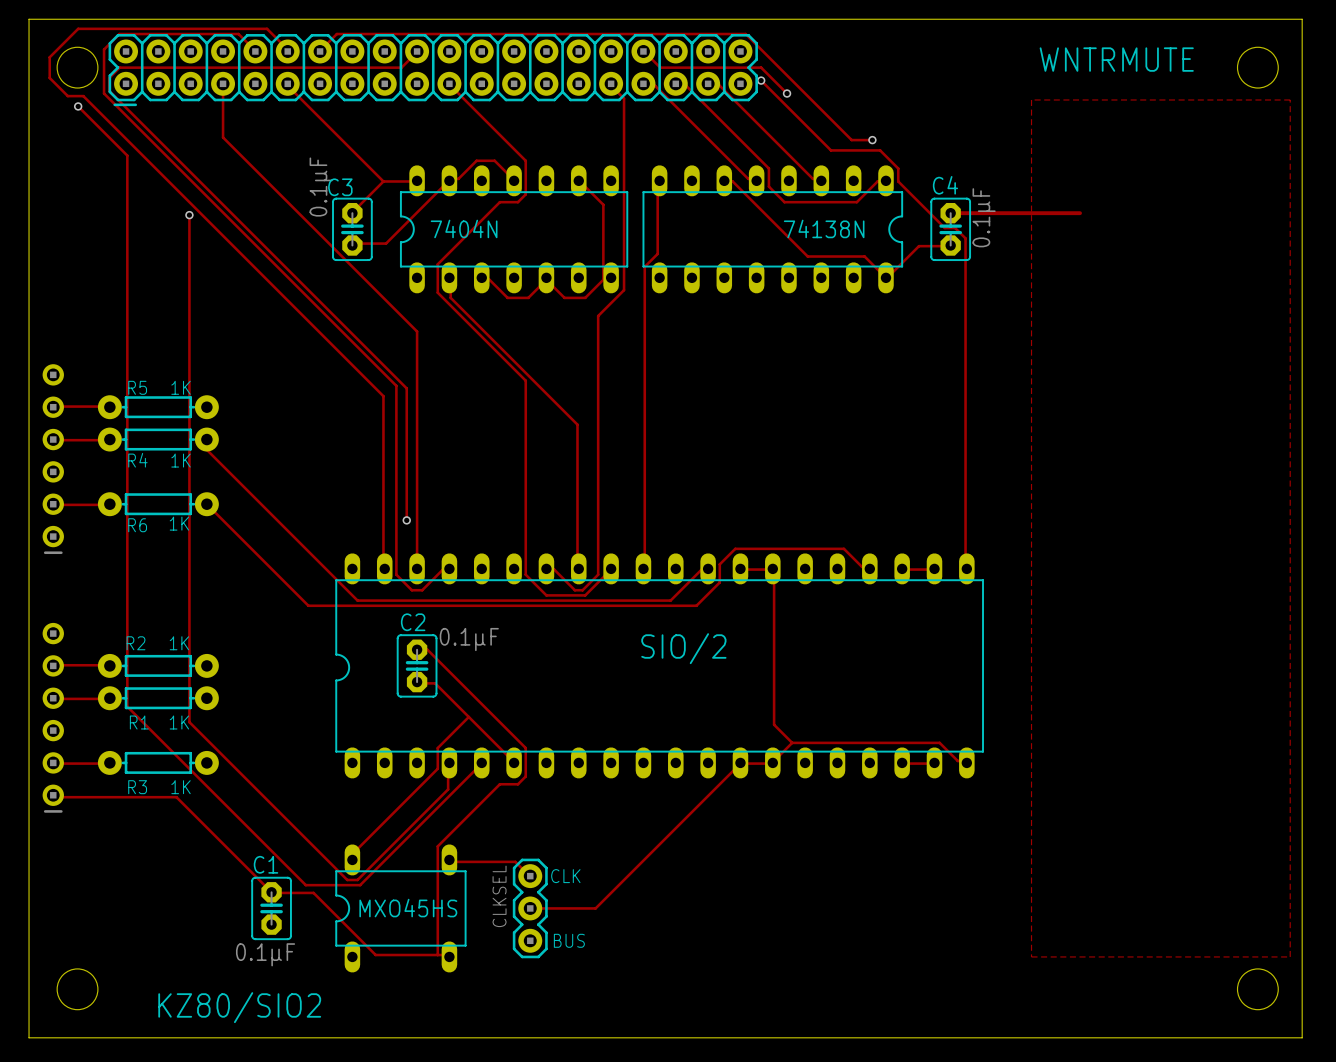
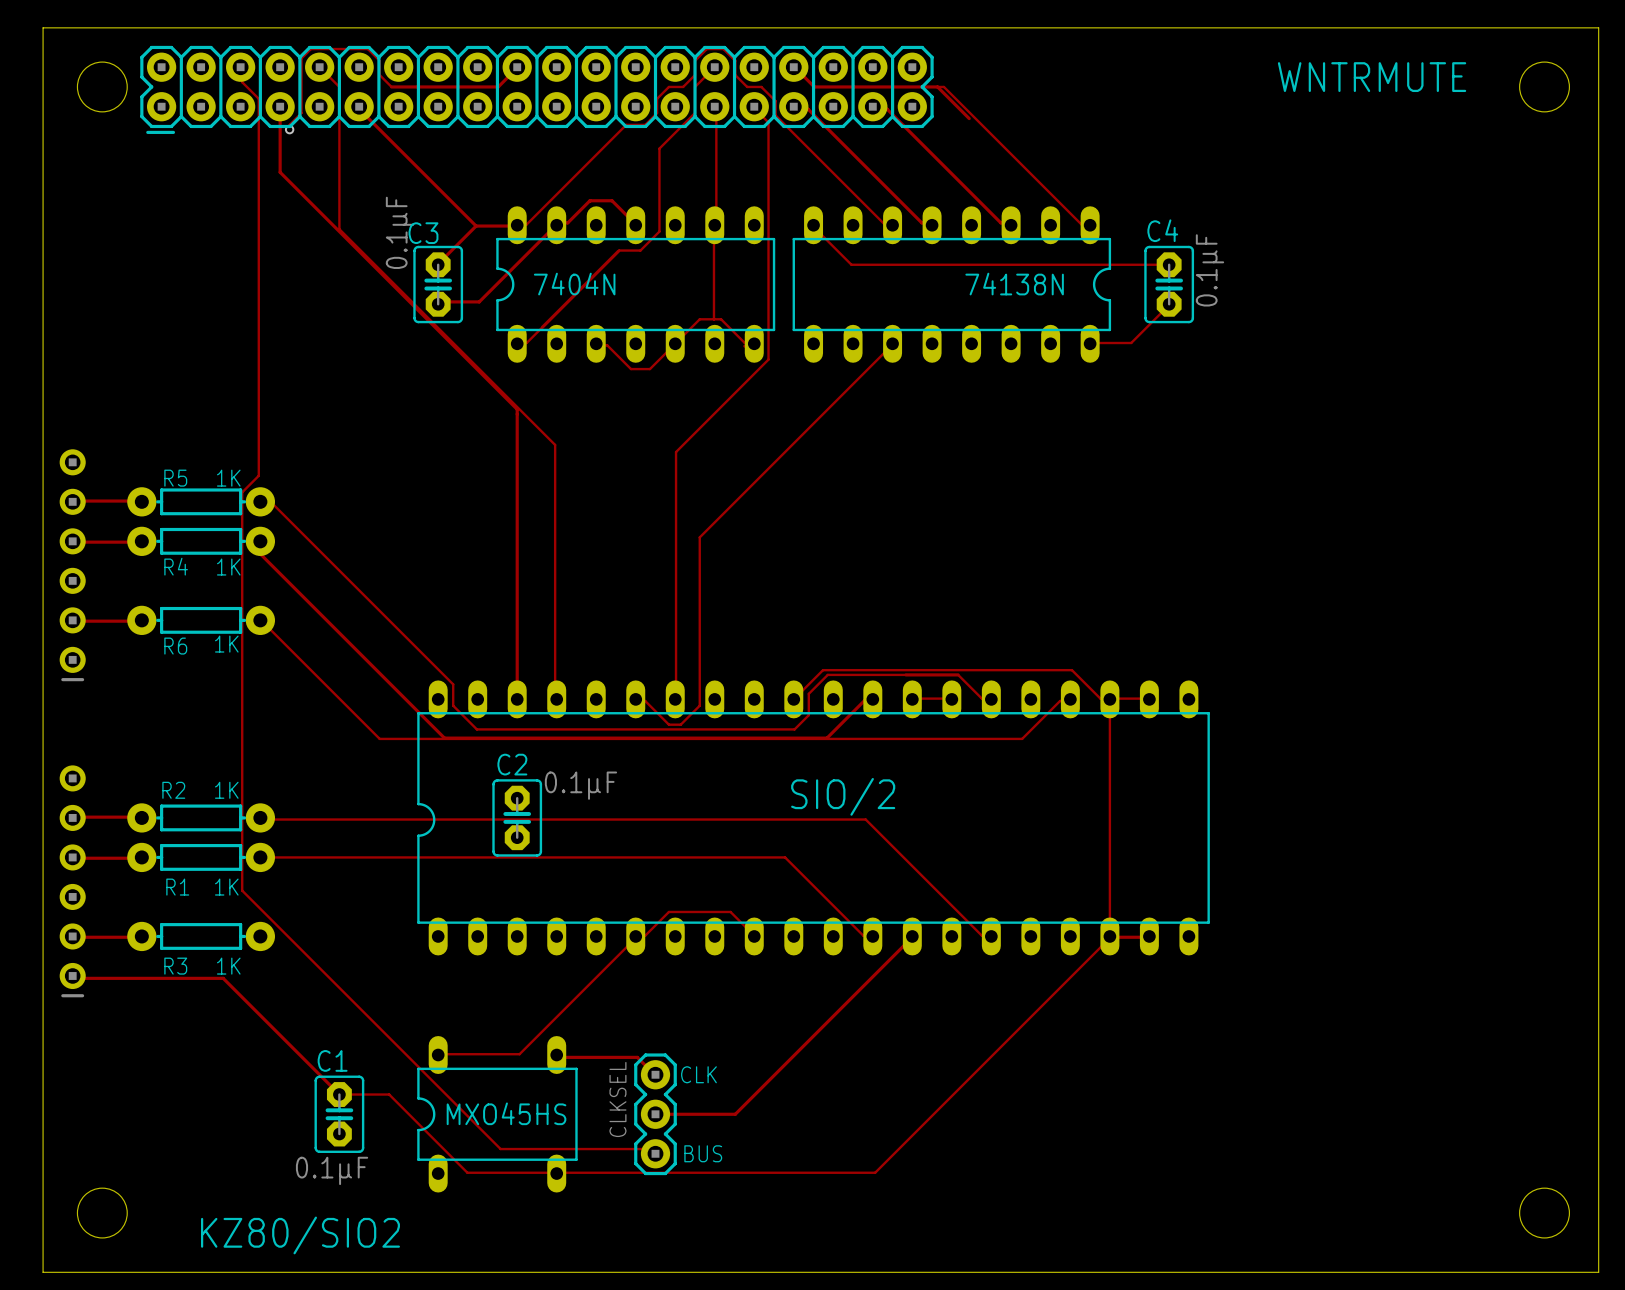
track: none -> (240, 67) (242, 82) (258, 98) (258, 475) (242, 492) (242, 890) (500, 1149) (649, 1149) (655, 1153)
track: (255, 51) (238, 34) (119, 34) (104, 49) (104, 93) (396, 385) (396, 574) (411, 590) (422, 590) (442, 569) (449, 568) -> (319, 67) (339, 86) (339, 229) (555, 444) (555, 698) (556, 699)
track: (287, 51) (267, 28) (78, 28) (49, 57) (49, 78) (67, 96) (83, 96) (383, 396) (384, 568) -> none
track: (320, 51) (336, 34) (745, 34) (851, 140) (872, 140) -> none
track: (314, 67) (119, 67) (109, 78) (109, 90) (406, 388) (406, 520) -> (391, 86) (379, 75) (379, 60) (367, 49) (310, 49) (301, 58) (301, 113) (289, 124) (289, 129)
track: (761, 80) (831, 150) (880, 150) (898, 168) (898, 181) (944, 228) (955, 228) (965, 238) (966, 568) -> none
via: (761, 80) -> none
track: (449, 83) (525, 160) (525, 194) (517, 202) (499, 202) -> (714, 67) (695, 86) (695, 113) (659, 148) (659, 231) (640, 250) (618, 251)
track: none -> (714, 106) (716, 108) (716, 224) (713, 226) (713, 319)
track: (675, 83) (675, 85) (686, 85) (768, 168) (768, 186) (784, 202) (856, 202) (877, 181) (885, 180) -> (937, 86) (943, 86) (1081, 224) (1090, 225)
track: (611, 85) (624, 98) (624, 290) (598, 316) (598, 574) (582, 590) (574, 590) (554, 569) (546, 568) -> (754, 108) (768, 122) (768, 359) (676, 452) (675, 699)
via: (787, 93) -> none
zone outline: (1031, 99) (1031, 956) (1290, 956) (1290, 99) (1031, 99) -> none
via: none -> (289, 129)
track: (78, 106) (127, 155) (127, 706) (305, 885) (360, 885) (481, 762) -> none
via: (78, 106) -> none
via: (872, 140) -> none
track: (578, 180) (603, 204) (603, 279) (585, 297) (564, 297) (546, 279) (528, 297) (507, 297) (489, 279) (481, 279) (481, 277) -> (754, 343) (744, 343) (721, 319) (699, 319) (649, 369) (631, 369) (607, 345) (596, 343)
track: (659, 180) (657, 181) (657, 253) (644, 266) (643, 568) -> none
track: (724, 180) (732, 181) (807, 256) (864, 256) (885, 277) (918, 246) (950, 245) -> (1090, 343) (1131, 343) (1169, 304)
track: none -> (892, 225) (884, 224) (775, 115) (775, 101) (761, 86) (747, 86) (735, 75) (735, 60) (723, 49) (706, 49) (695, 60) (695, 75) (683, 86) (668, 86) (657, 98) (657, 113) (645, 124) (626, 124) (526, 224) (517, 224) (517, 226)
track: (950, 213) (1080, 213) -> (1169, 264) (851, 264) (813, 225)
track: (189, 215) (189, 722) (347, 879) (357, 879) (448, 789) (449, 762) -> none
via: (189, 215) -> none
track: (437, 264) (437, 292) (525, 380) (525, 574) (546, 595) (585, 595) (611, 568) -> (542, 327) (526, 343) (517, 343)
track: (449, 277) (450, 297) (577, 424) (578, 568) -> none
track: none -> (892, 343) (699, 537) (699, 705) (680, 724) (668, 724) (645, 700) (635, 700) (635, 699)
track: (206, 504) (308, 605) (696, 605) (719, 582) (719, 564) (735, 548) -> (260, 501) (270, 501) (453, 684) (453, 705) (476, 729) (794, 729) (808, 715) (808, 693) (827, 674) (906, 674)
track: none -> (260, 620) (379, 738) (1022, 738) (1060, 700) (1070, 699)
via: (406, 520) -> none
track: (777, 548) (843, 548) (862, 566) (869, 566) (869, 568) -> (958, 674) (981, 698) (991, 699)
track: (740, 568) (774, 569) (774, 724) (792, 742) -> (912, 699) (951, 699)
track: (902, 568) (934, 568) -> (793, 699) (823, 670) (1071, 670) (1100, 698) (1149, 699)
track: (417, 649) (427, 649) (525, 748) (525, 776) (517, 784) (499, 784) (437, 846) (437, 955) -> none
track: none -> (260, 817) (261, 819) (865, 819) (981, 935) (991, 936)
track: (417, 682) (435, 683) (514, 762) -> none
track: none -> (260, 857) (785, 857) (863, 935) (872, 936)
track: (468, 717) (437, 748) (437, 768) (352, 854) (352, 859) -> (754, 936) (730, 911) (668, 911) (645, 935) (635, 935) (635, 938) (519, 1054) (438, 1055)
track: (792, 742) (939, 742) (957, 760) (965, 760) (966, 762) -> none
track: (792, 742) (771, 763) (740, 763) -> none
track: (271, 892) (313, 892) (375, 955) (448, 955) (449, 956) -> (339, 1094) (389, 1094) (467, 1172) (875, 1172) (1109, 938) (1109, 698)

